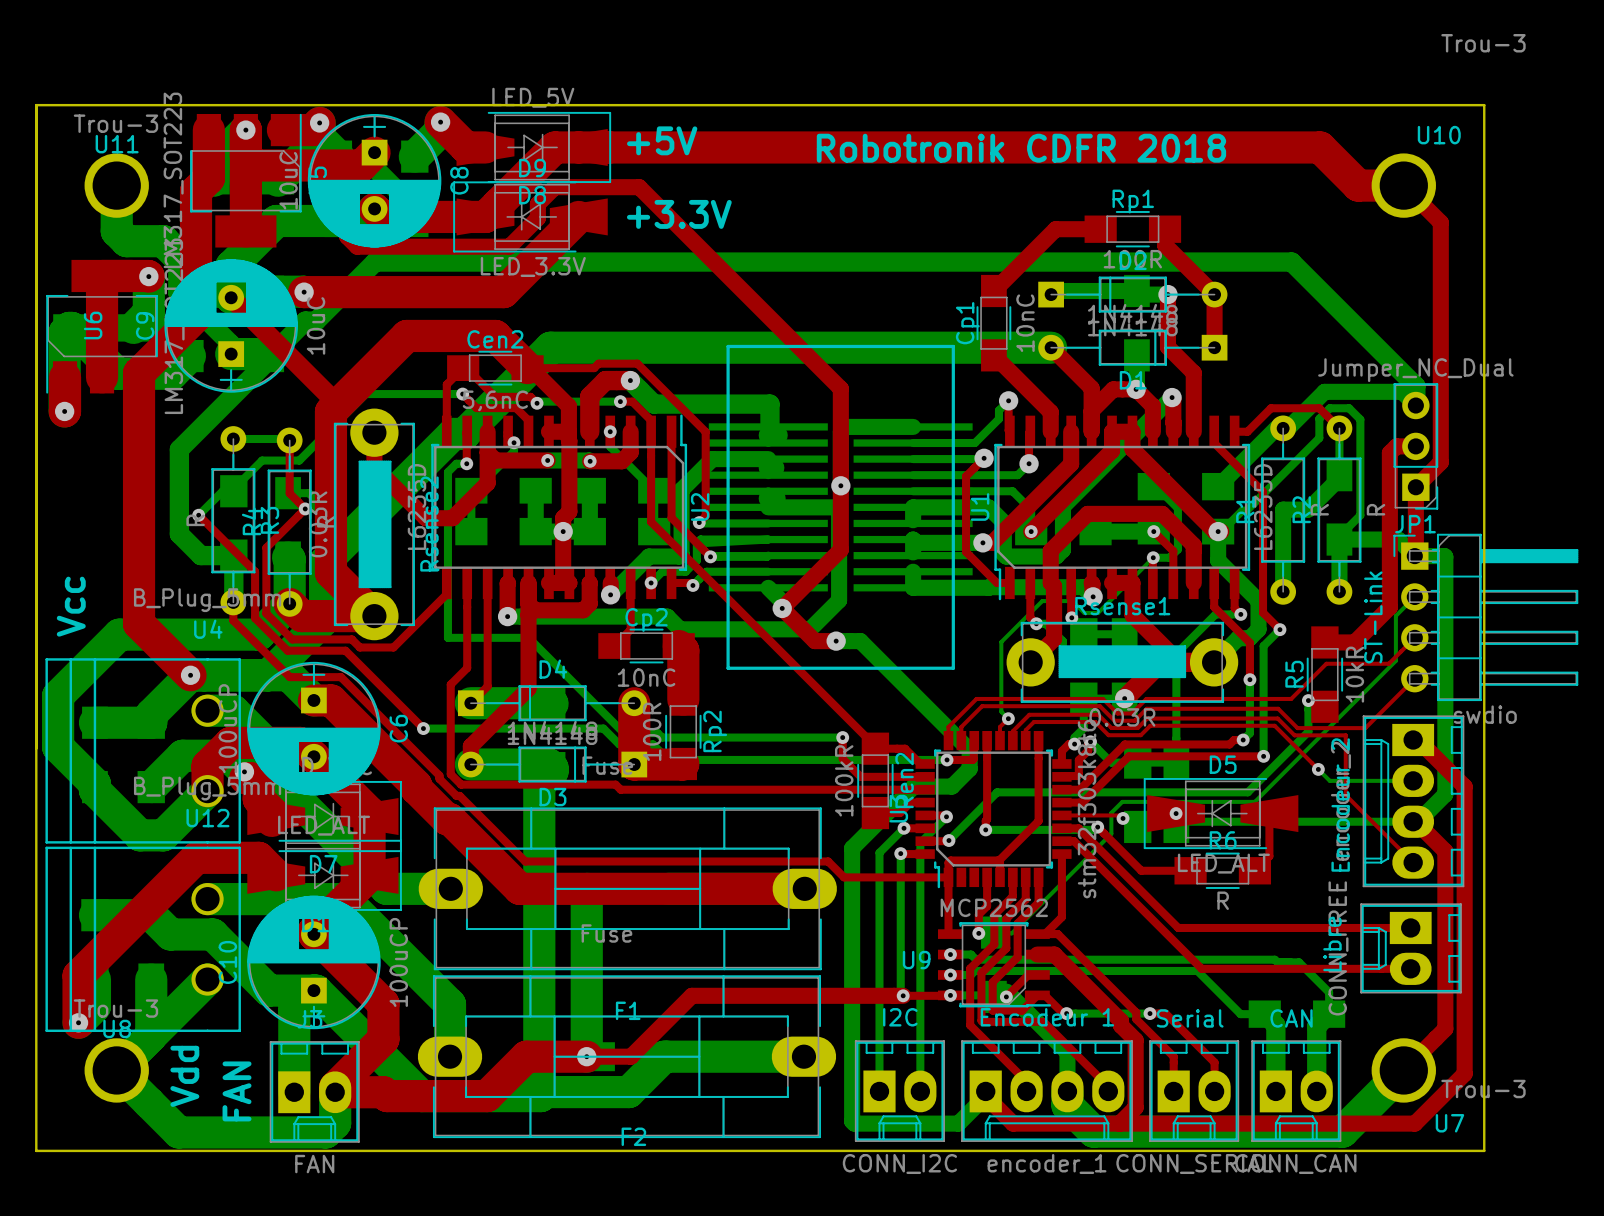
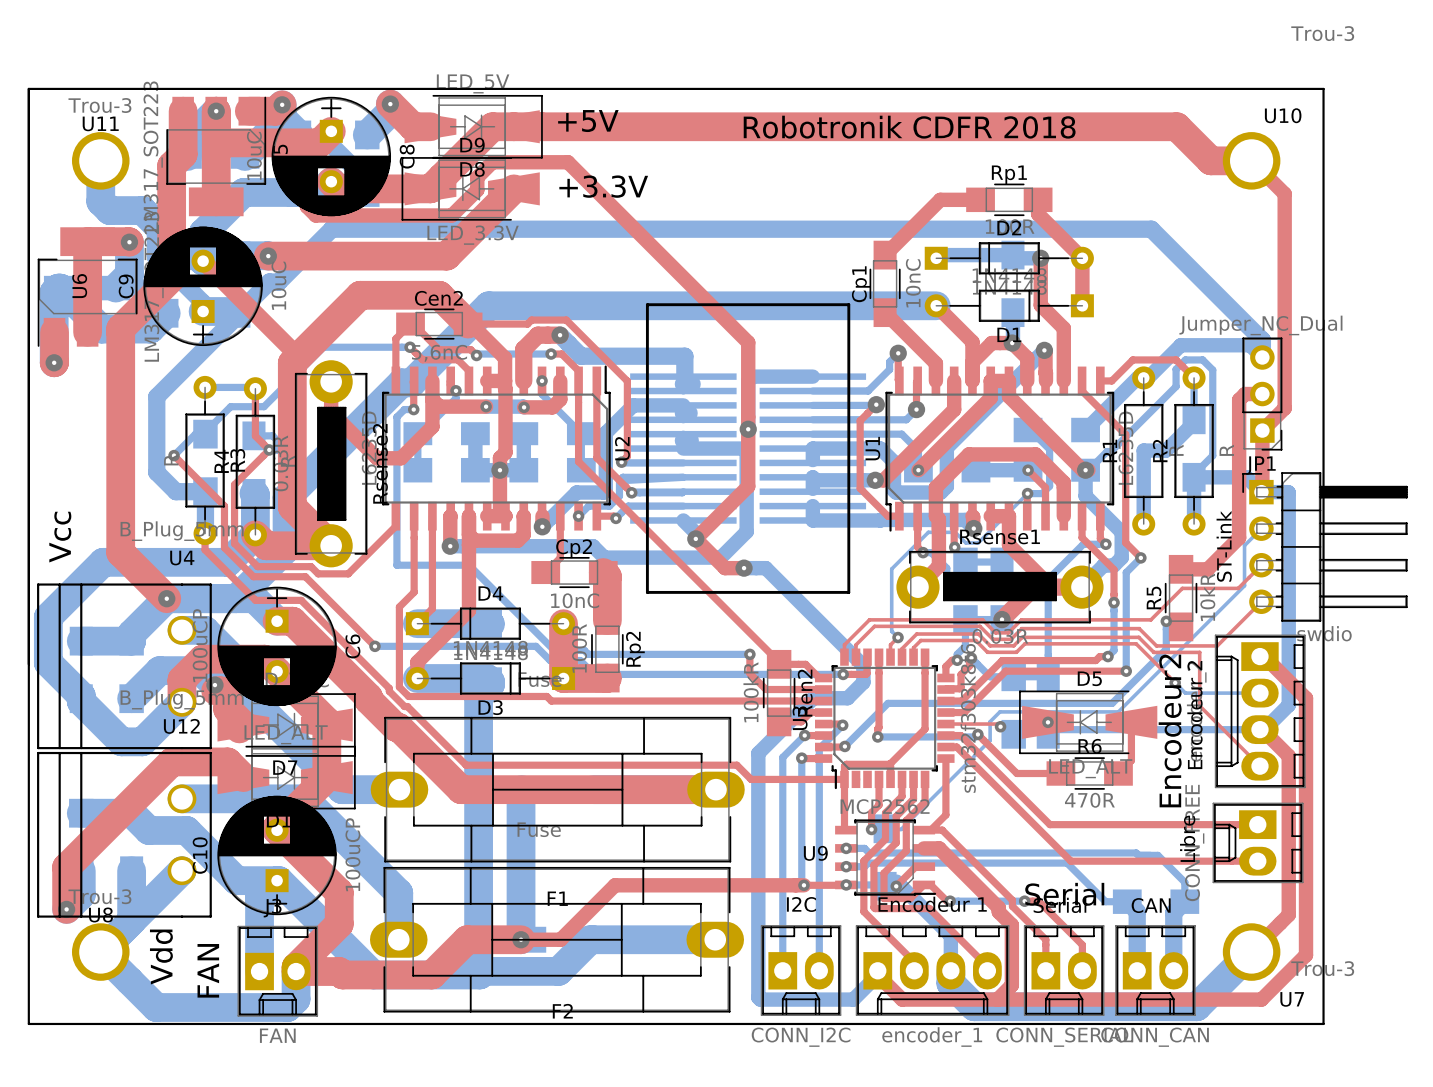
text: none -> Encodeur2 (1170, 730)
R6 value: R (1223, 900) -> 470R (1089, 800)
text: none -> Serial (1064, 894)

